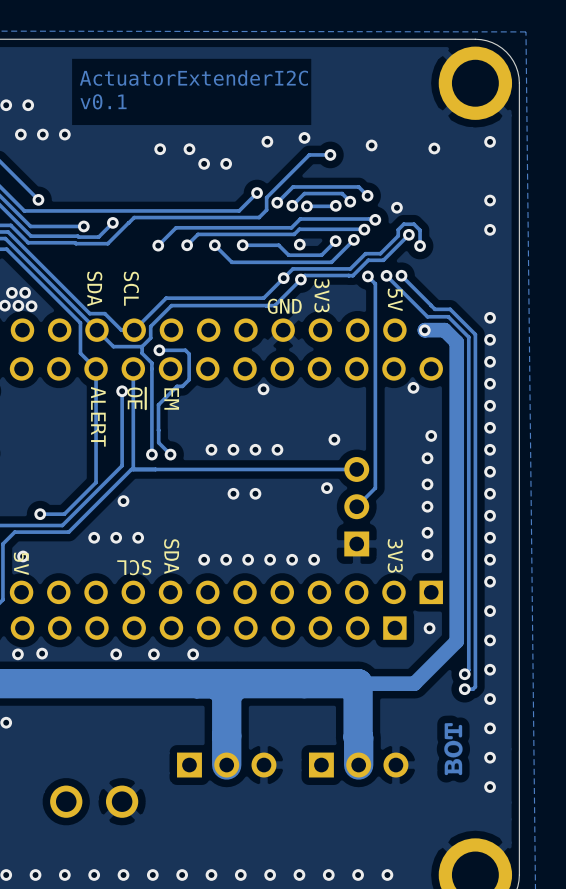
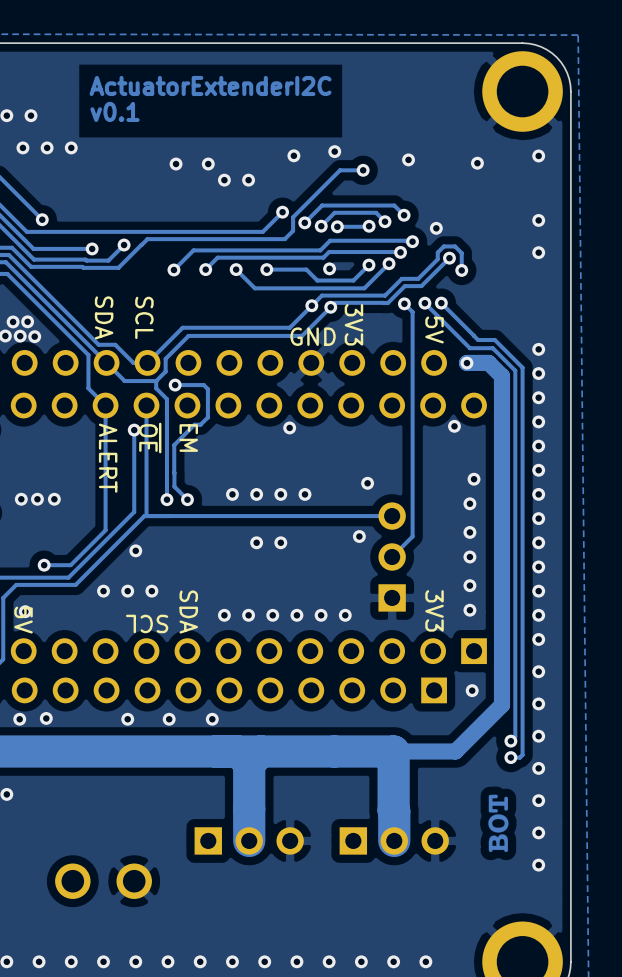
via: none -> (21, 499)
via: none -> (37, 499)
via: none -> (54, 499)

